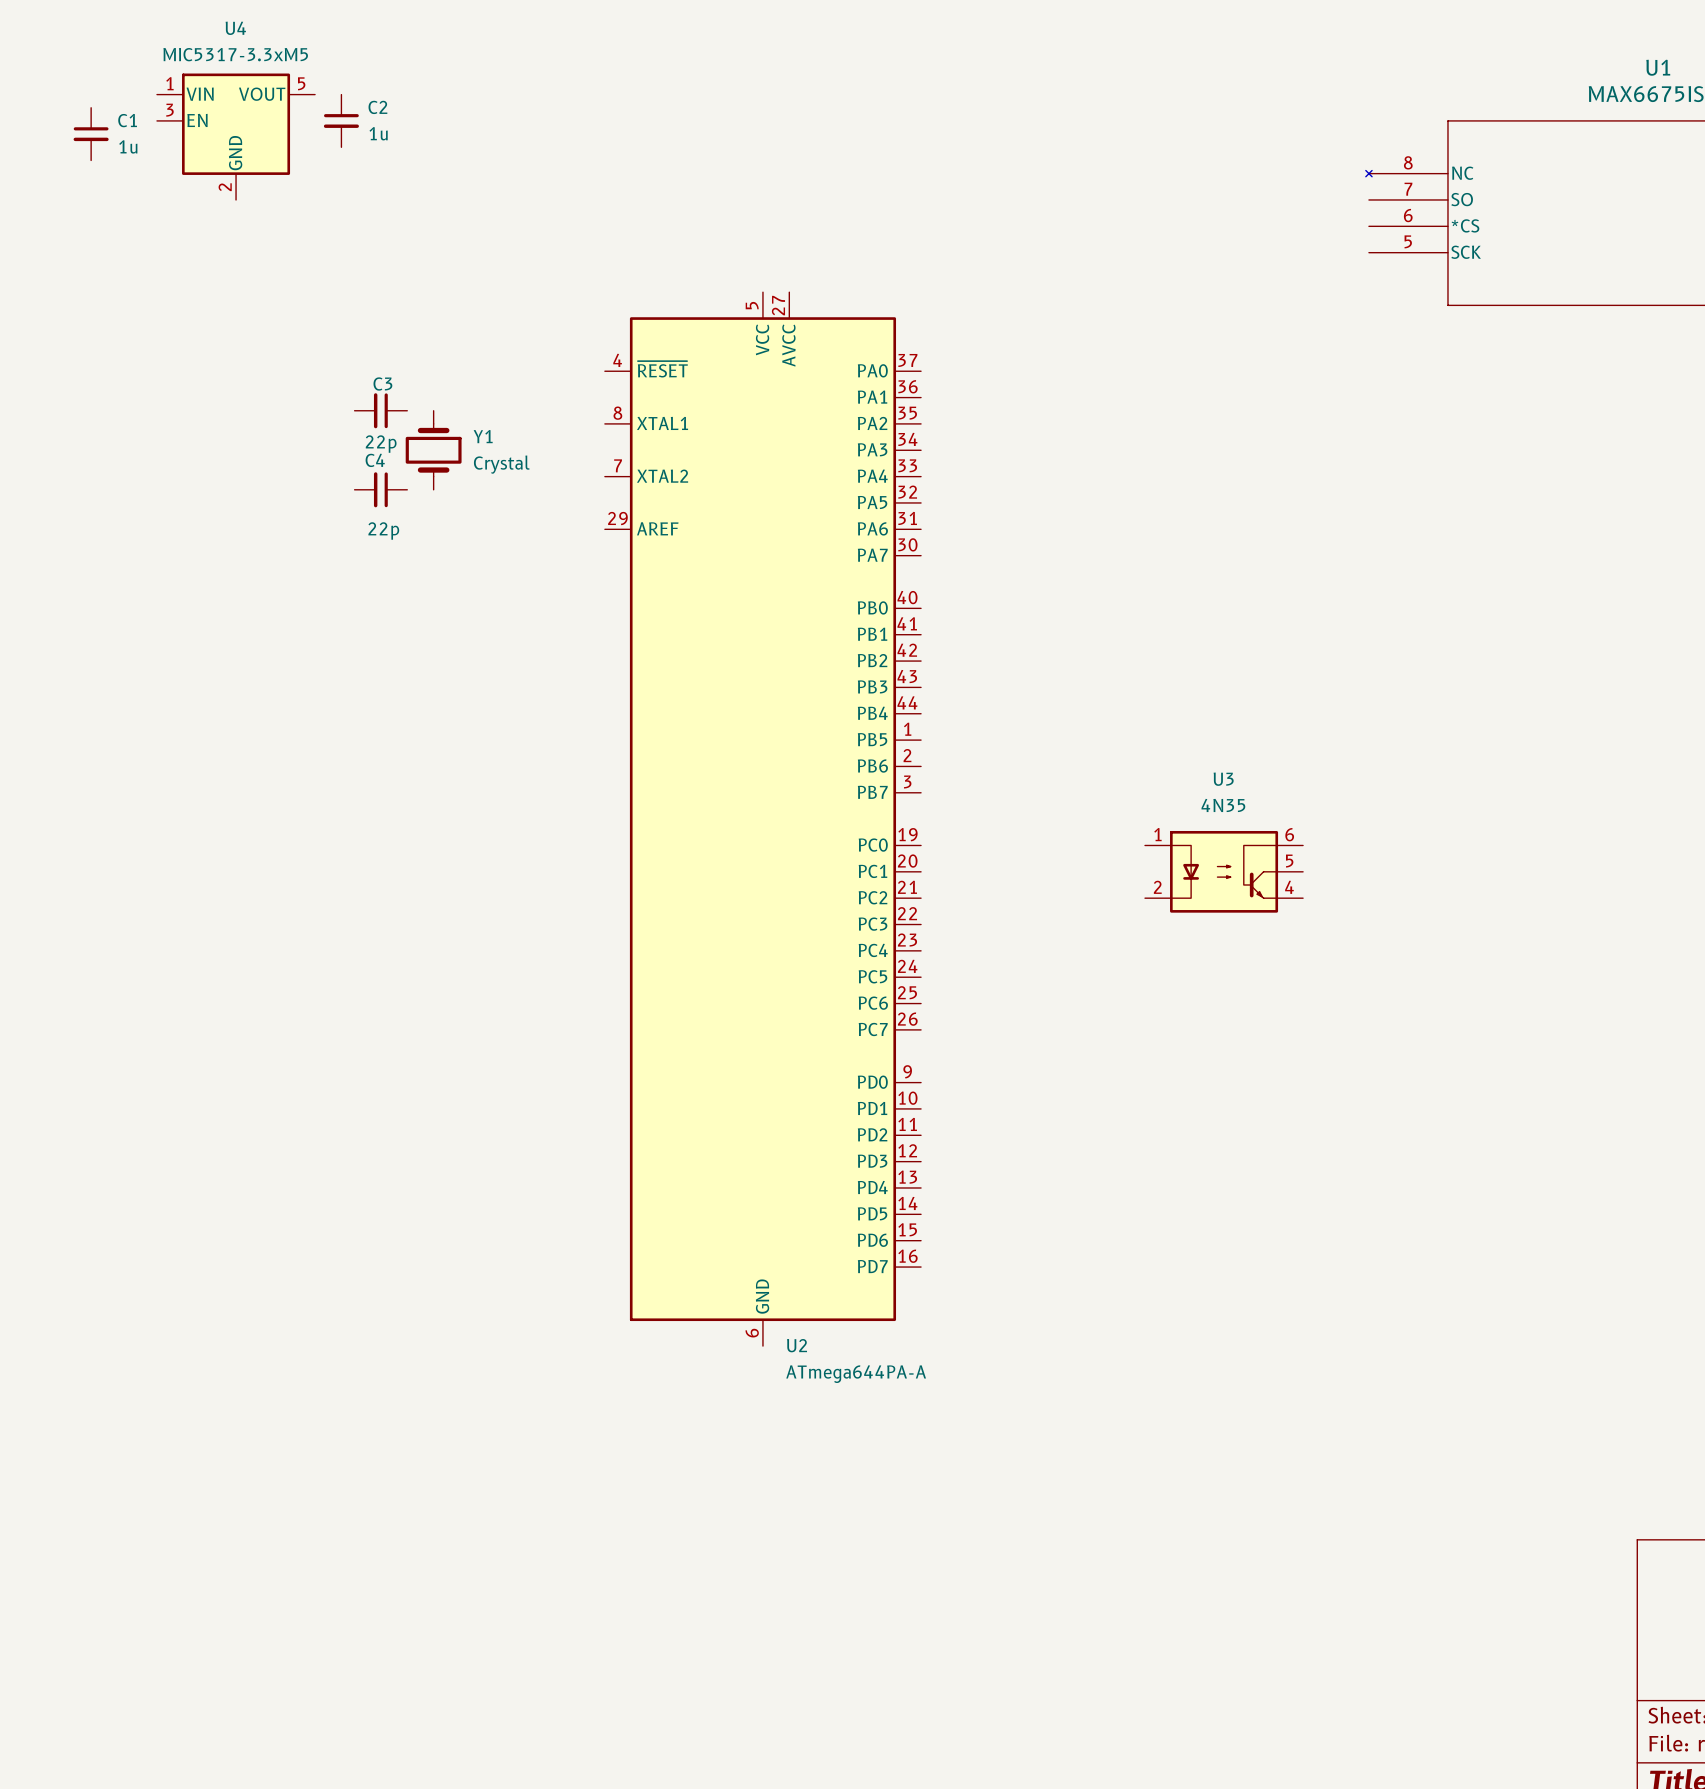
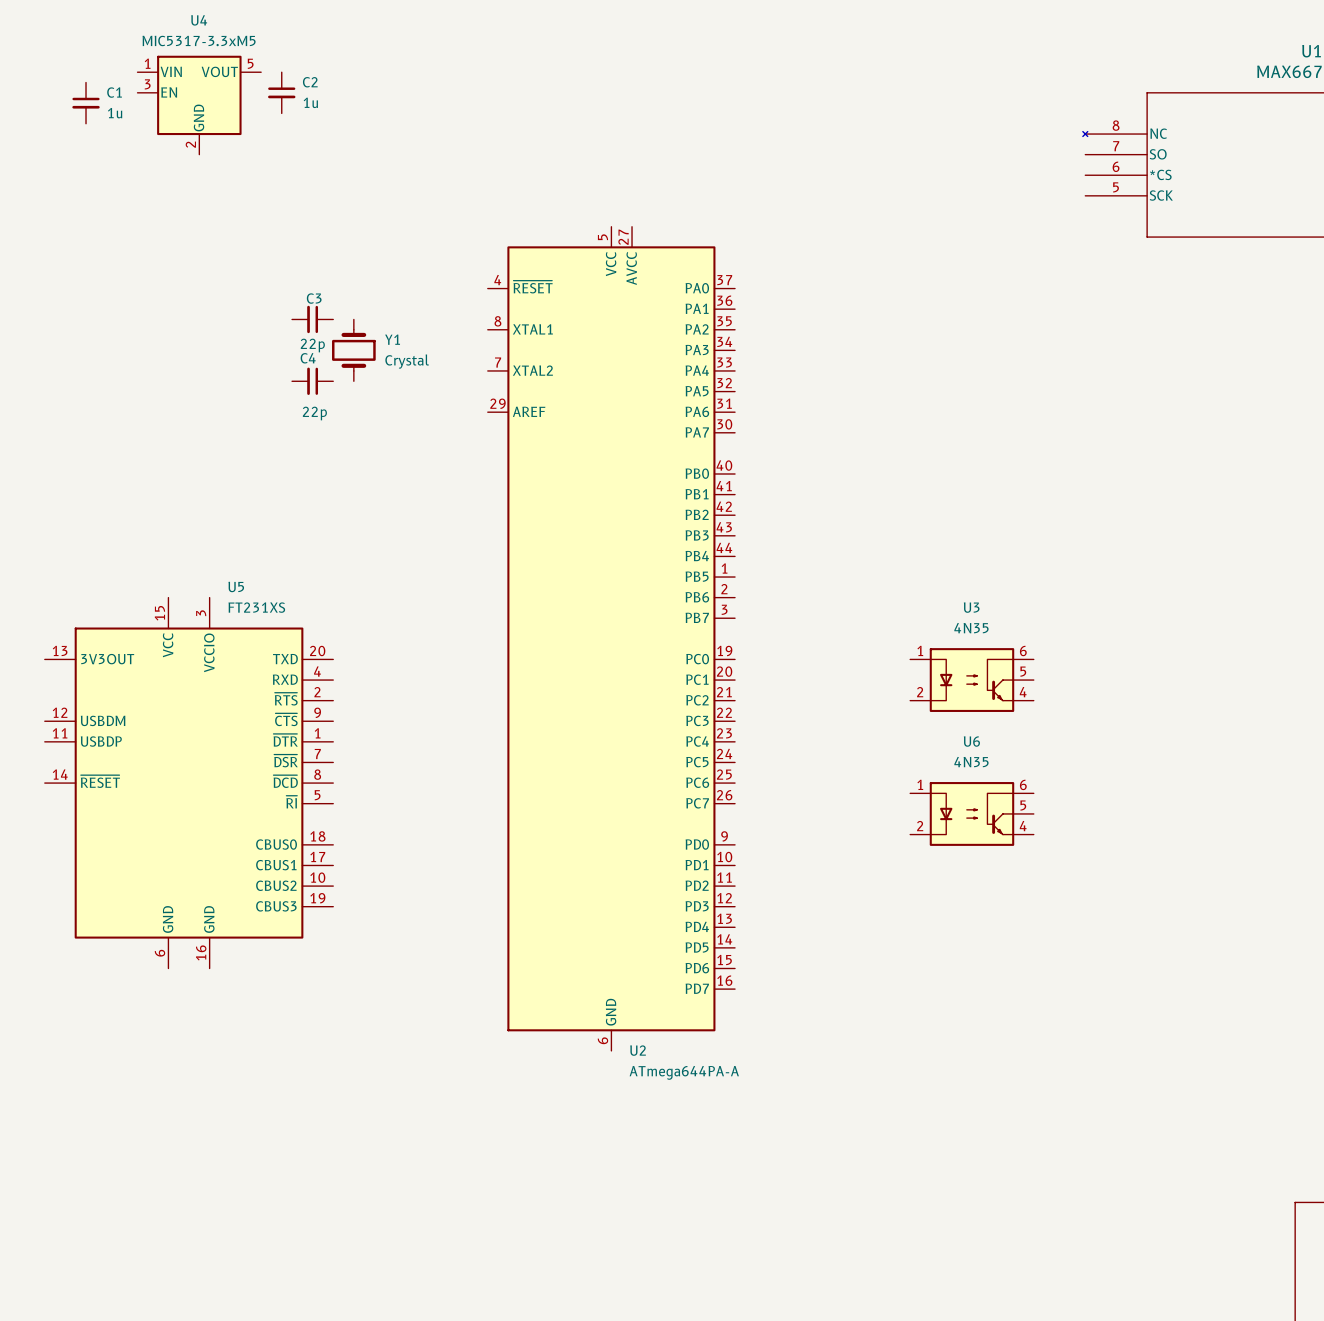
U5: none -> FT231XS (189, 783)
U6: none -> 4N35 (971, 813)

